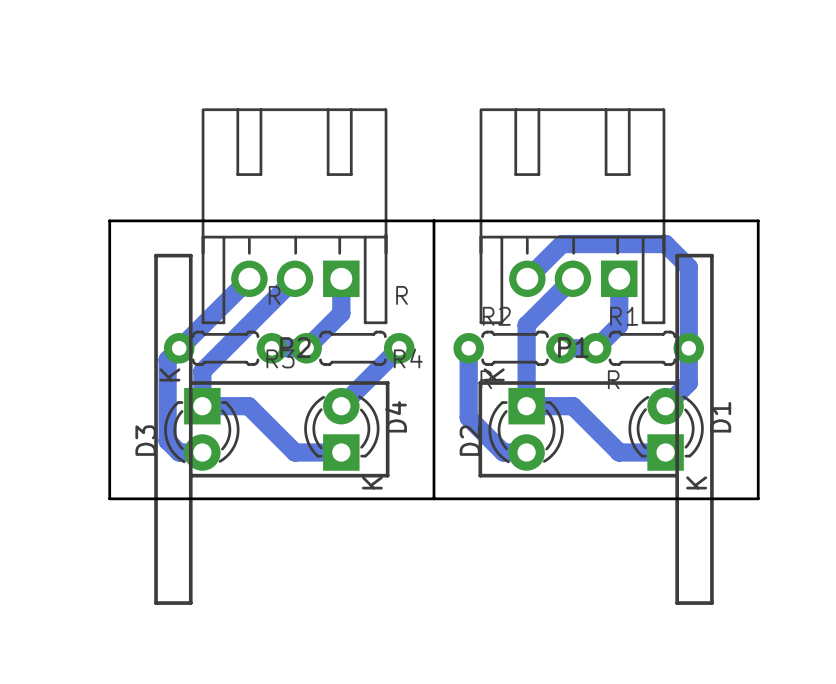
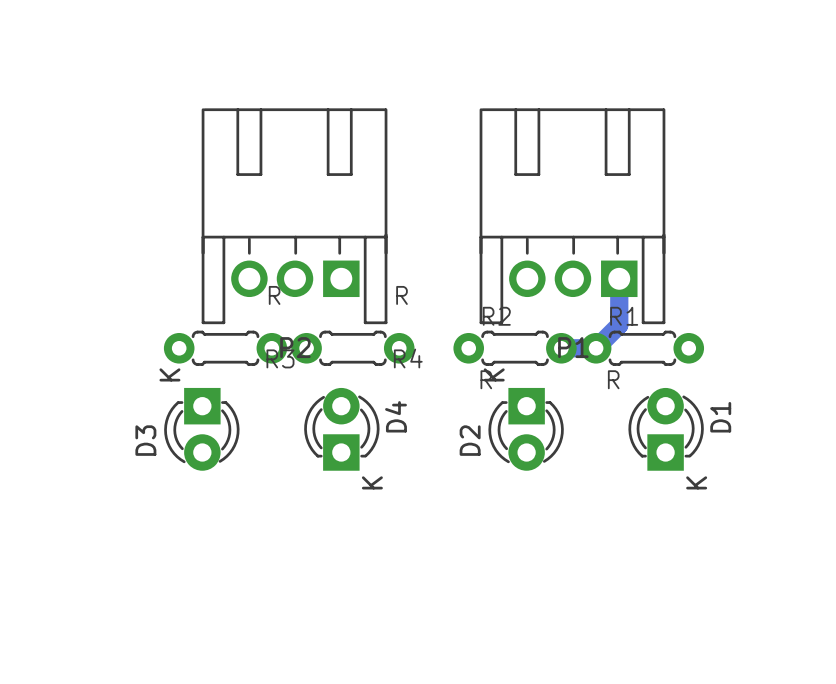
board edge: (109, 220) (758, 220) (758, 498) (109, 498) (109, 220) -> none
board edge: (433, 220) (433, 498) -> none
line: (156, 255) (190, 255) (190, 603) (156, 603) (156, 255) -> none
line: (677, 255) (711, 255) (711, 603) (677, 603) (677, 255) -> none
bottom track: (249, 278) (167, 359) (167, 440) (179, 452) (202, 452) -> none
bottom track: (295, 278) (202, 371) (202, 406) (248, 406) (295, 452) (341, 452) -> none
bottom track: (341, 278) (341, 313) (306, 348) (271, 348) -> none
bottom track: (527, 278) (562, 244) (665, 244) (688, 267) (688, 383) (665, 406) -> none
bottom track: (572, 278) (526, 325) (526, 406) (572, 406) (619, 452) (665, 452) -> none
bottom track: (399, 348) (341, 406) -> none
bottom track: (468, 348) (468, 417) (503, 452) (526, 452) -> none
line: (190, 383) (387, 383) (387, 475) (190, 475) -> none
line: (677, 383) (480, 383) (480, 475) (677, 475) -> none

